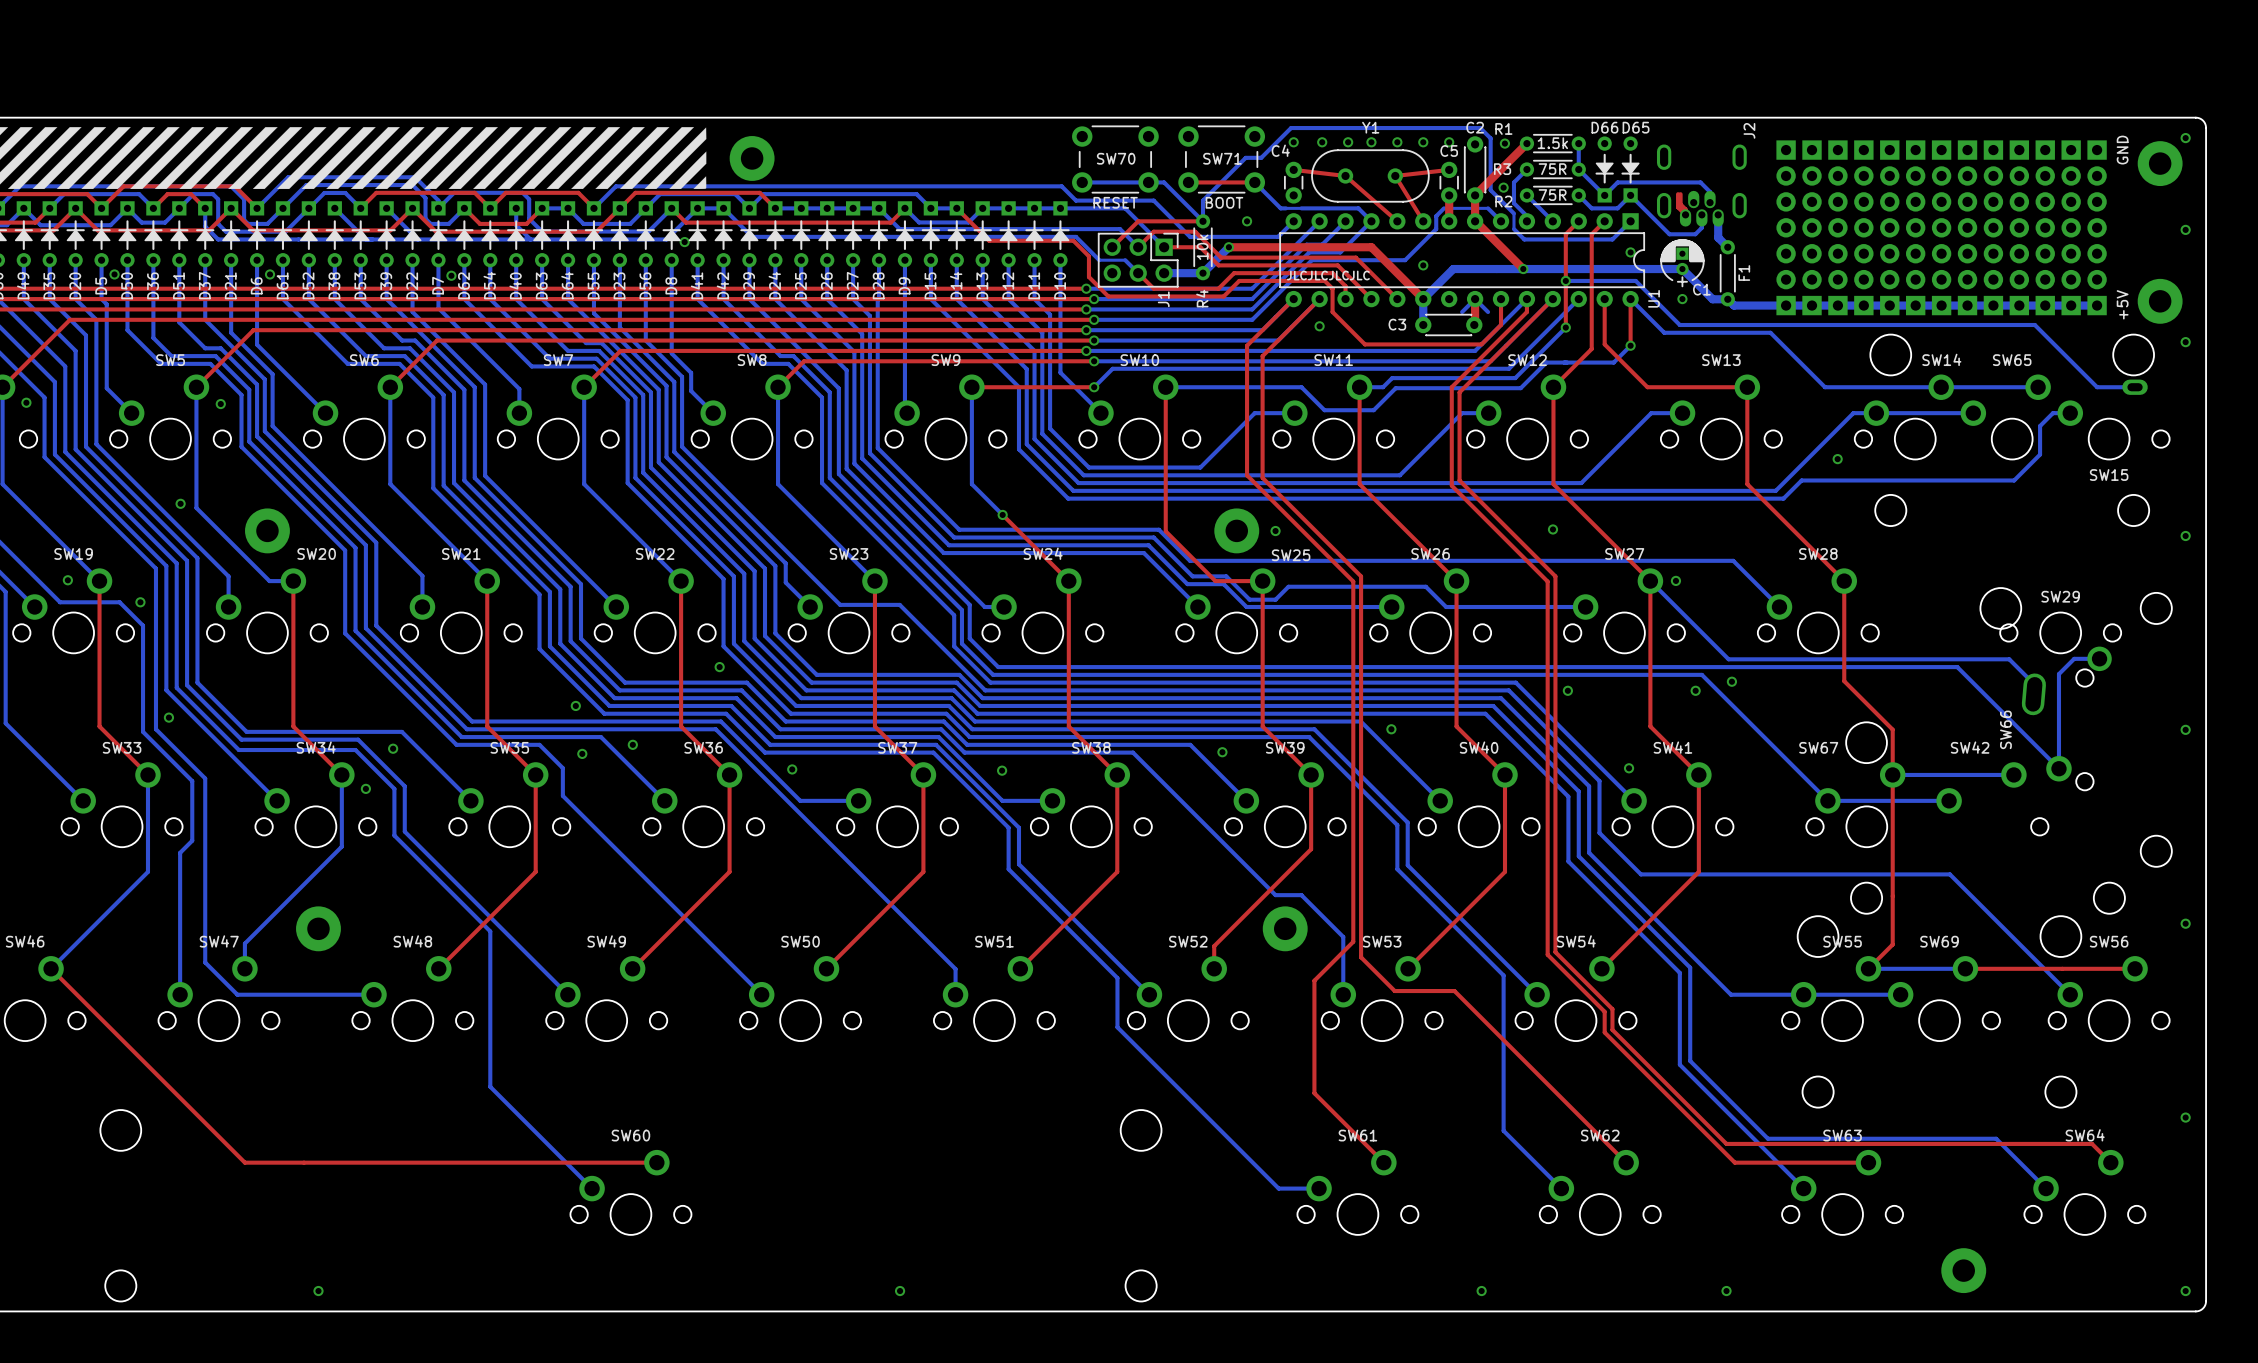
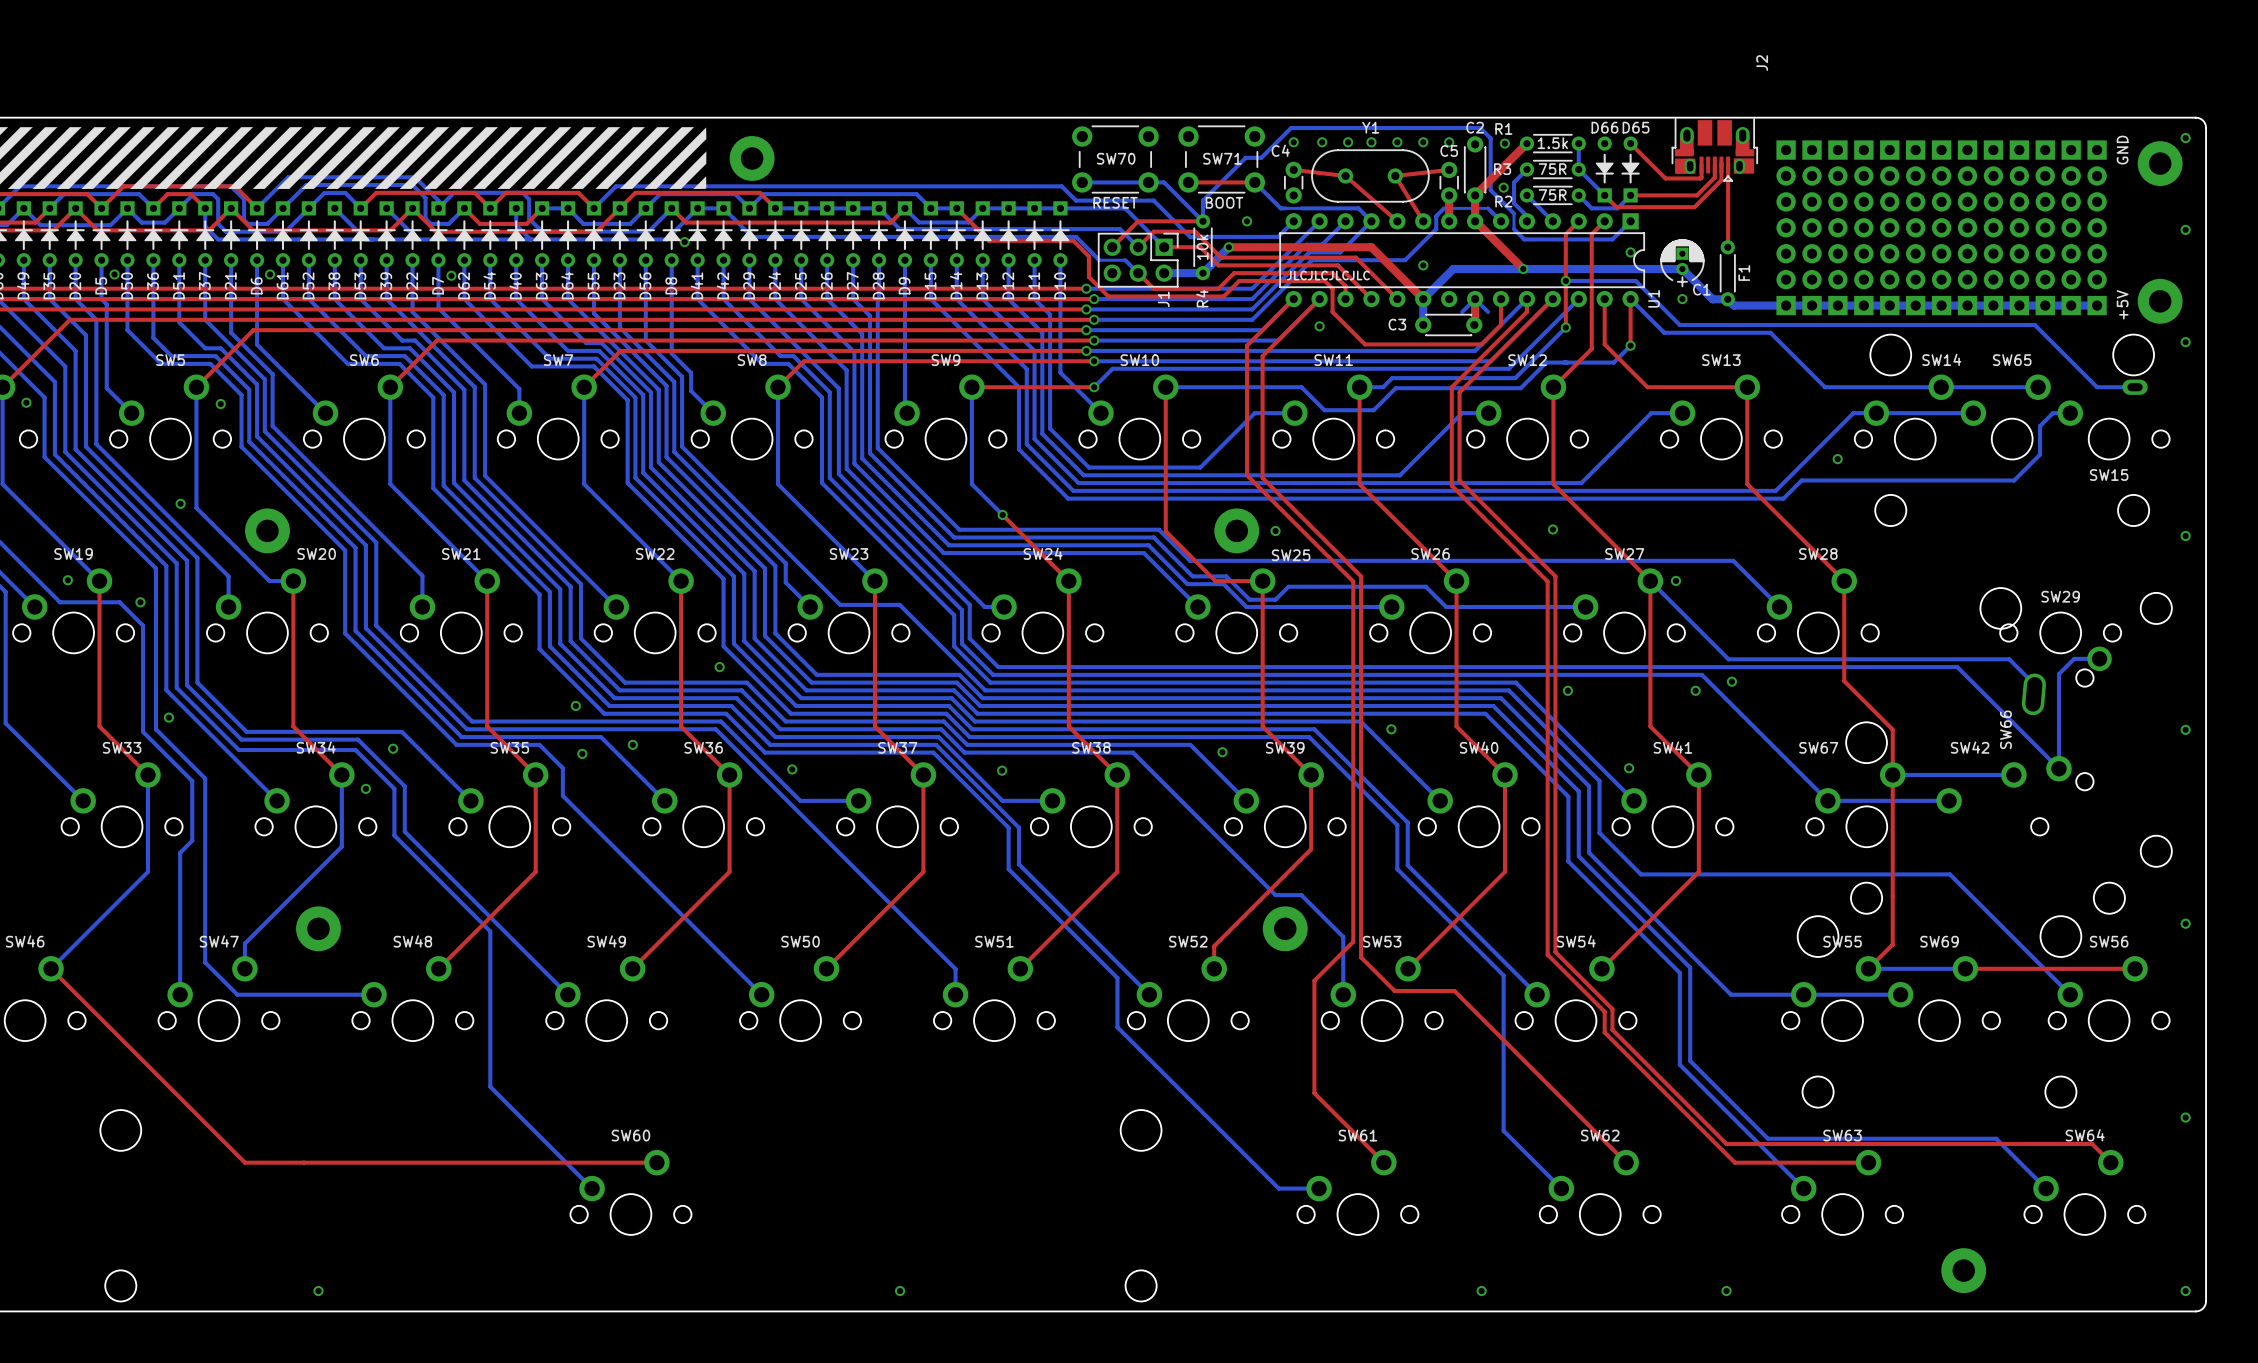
J2 name position: J2 (1749, 130) -> J2 (1762, 63)
top track: none -> (1630, 143) (1665, 178) (1700, 178) (1701, 165)
J2 footprint: [1656, 144, 1747, 227] -> [1671, 118, 1758, 182]
top track: none -> (1721, 162) (1721, 180) (1694, 207) (1616, 207) (1604, 195)
top track: none -> (1714, 165) (1714, 177) (1696, 195) (1630, 195)
top track: none -> (1728, 165) (1727, 247)
top track: (1678, 194) (1678, 207) (1685, 214) (1685, 209) (1680, 204) (1680, 194) -> none
bottom track: (1604, 195) (1617, 182) (1700, 182) (1710, 191) (1710, 202) -> none
bottom track: (1630, 195) (1669, 234) (1695, 234) (1701, 227) (1701, 214) -> none
bottom track: (1718, 214) (1718, 237) (1727, 247) -> none

